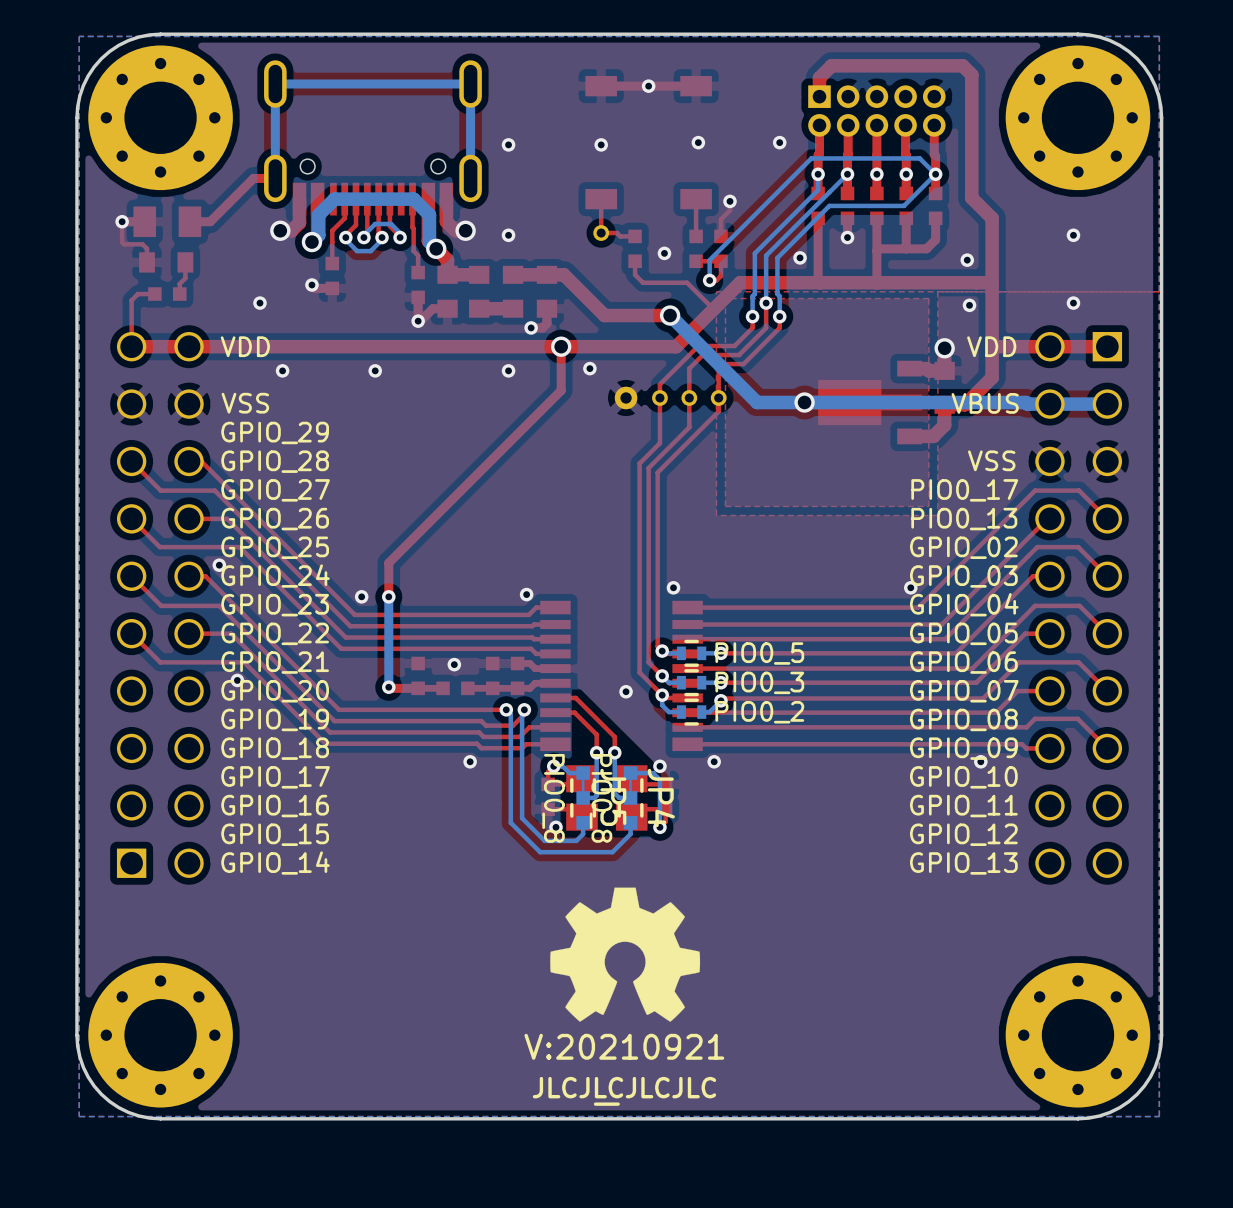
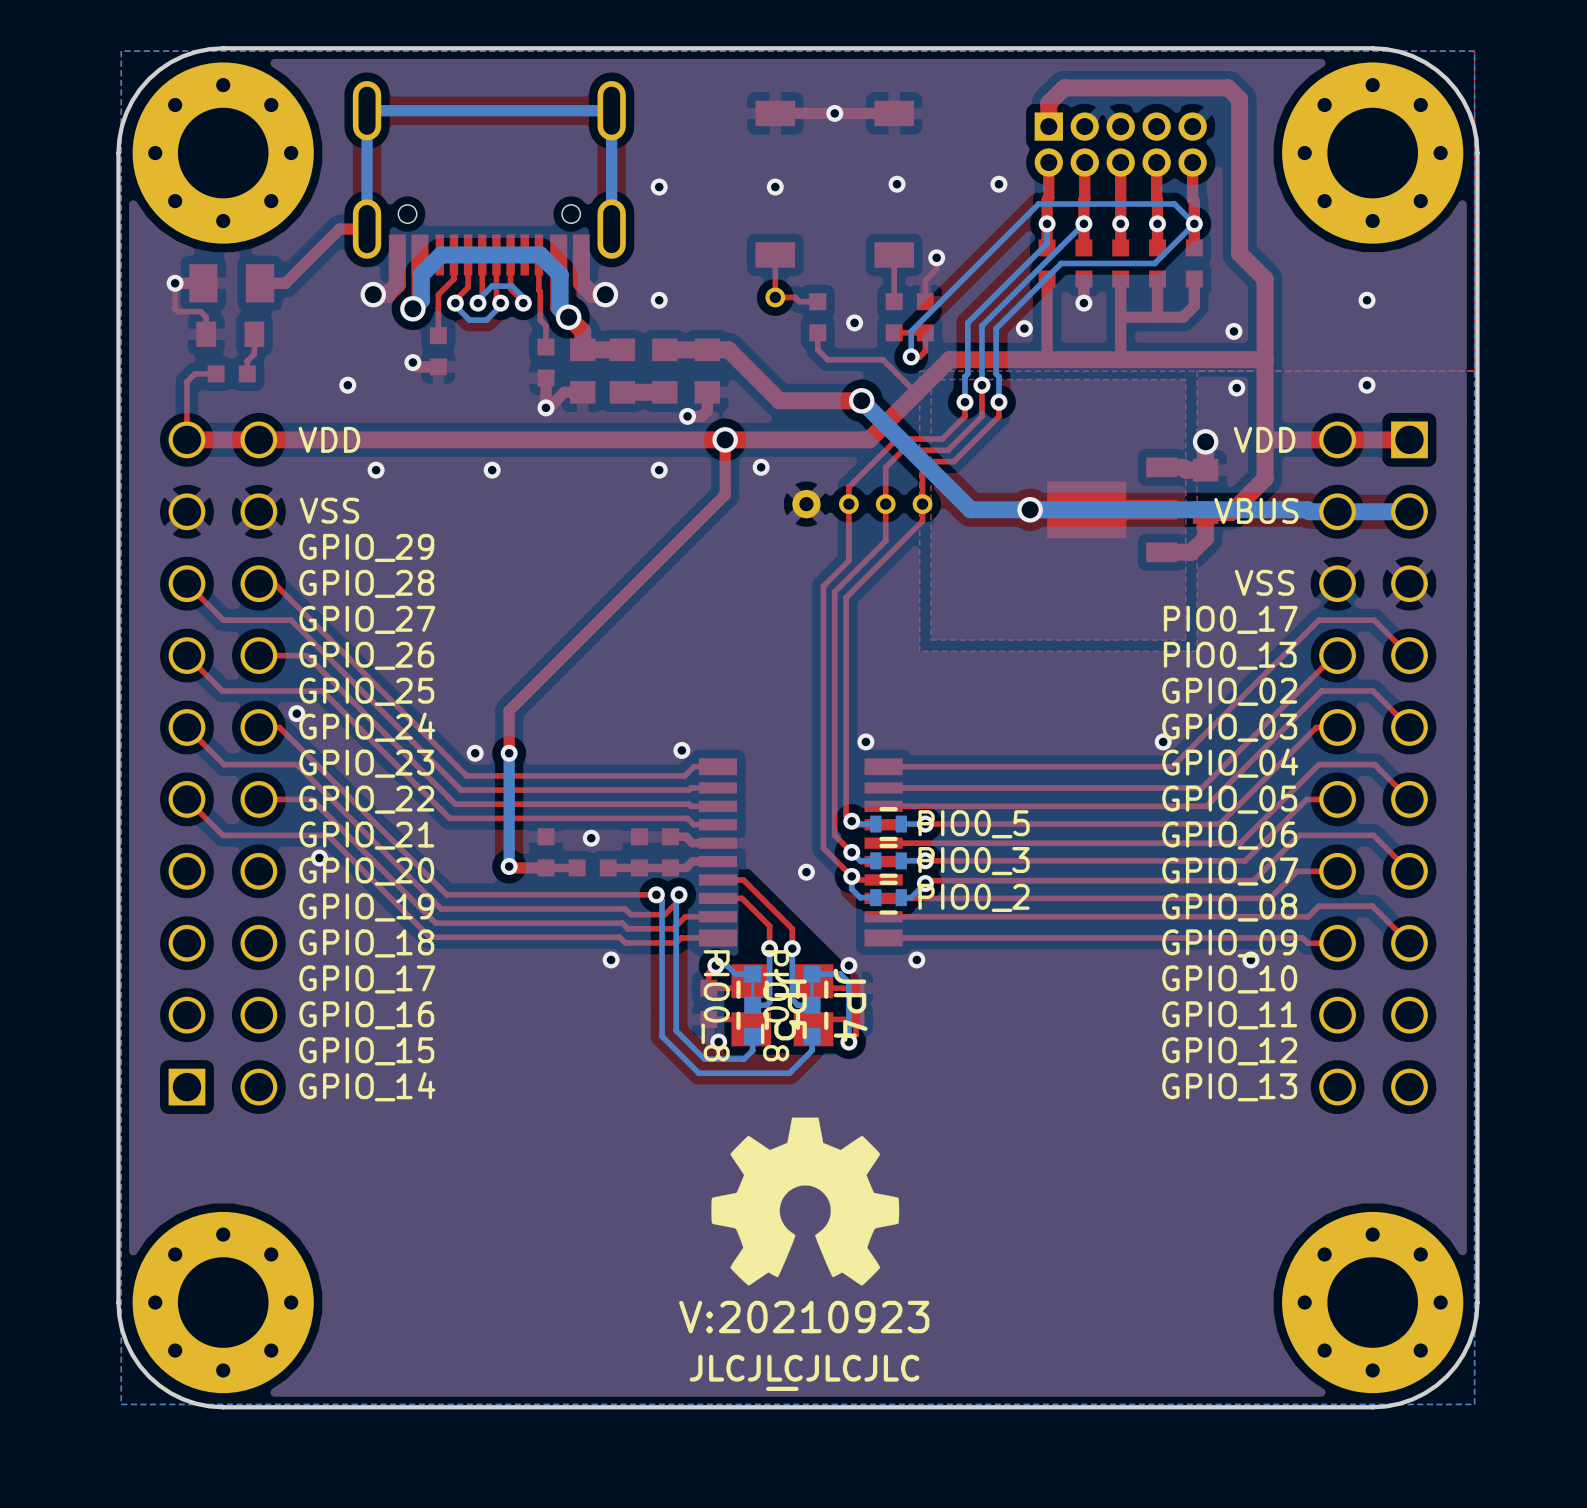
drawing shape: [524, 1033, 725, 1060] -> [679, 1300, 930, 1334]

